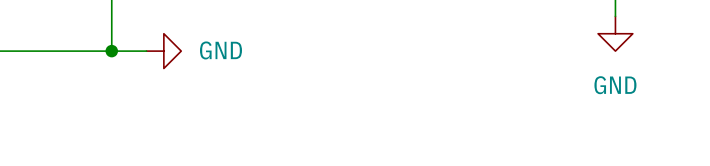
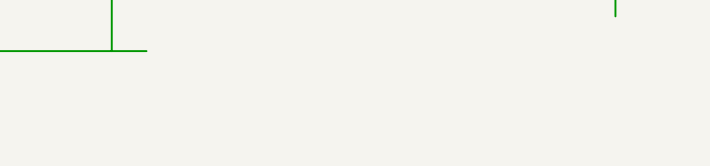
power symbol: GND (615, 33) -> none
junction: (111, 51) -> none
power symbol: GND (163, 51) -> none

